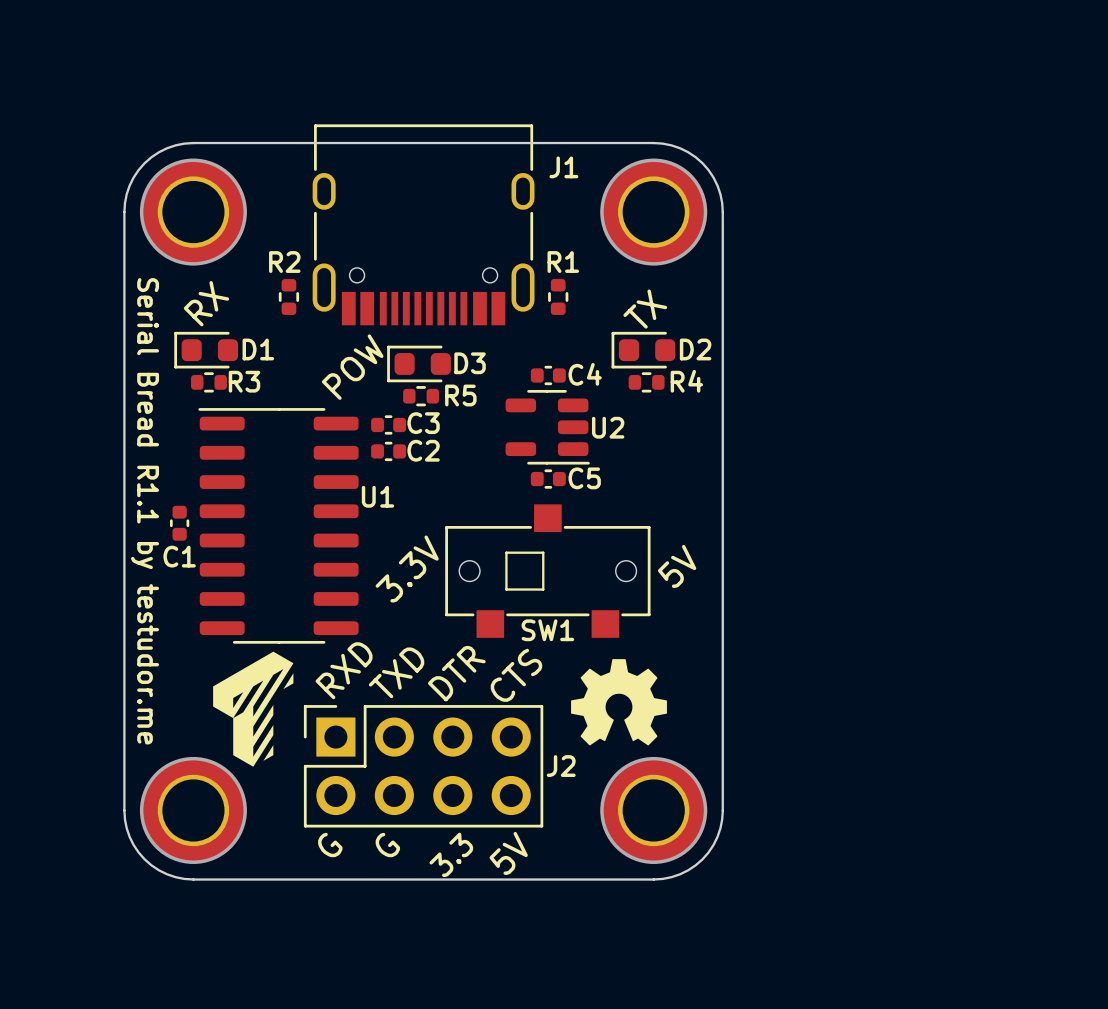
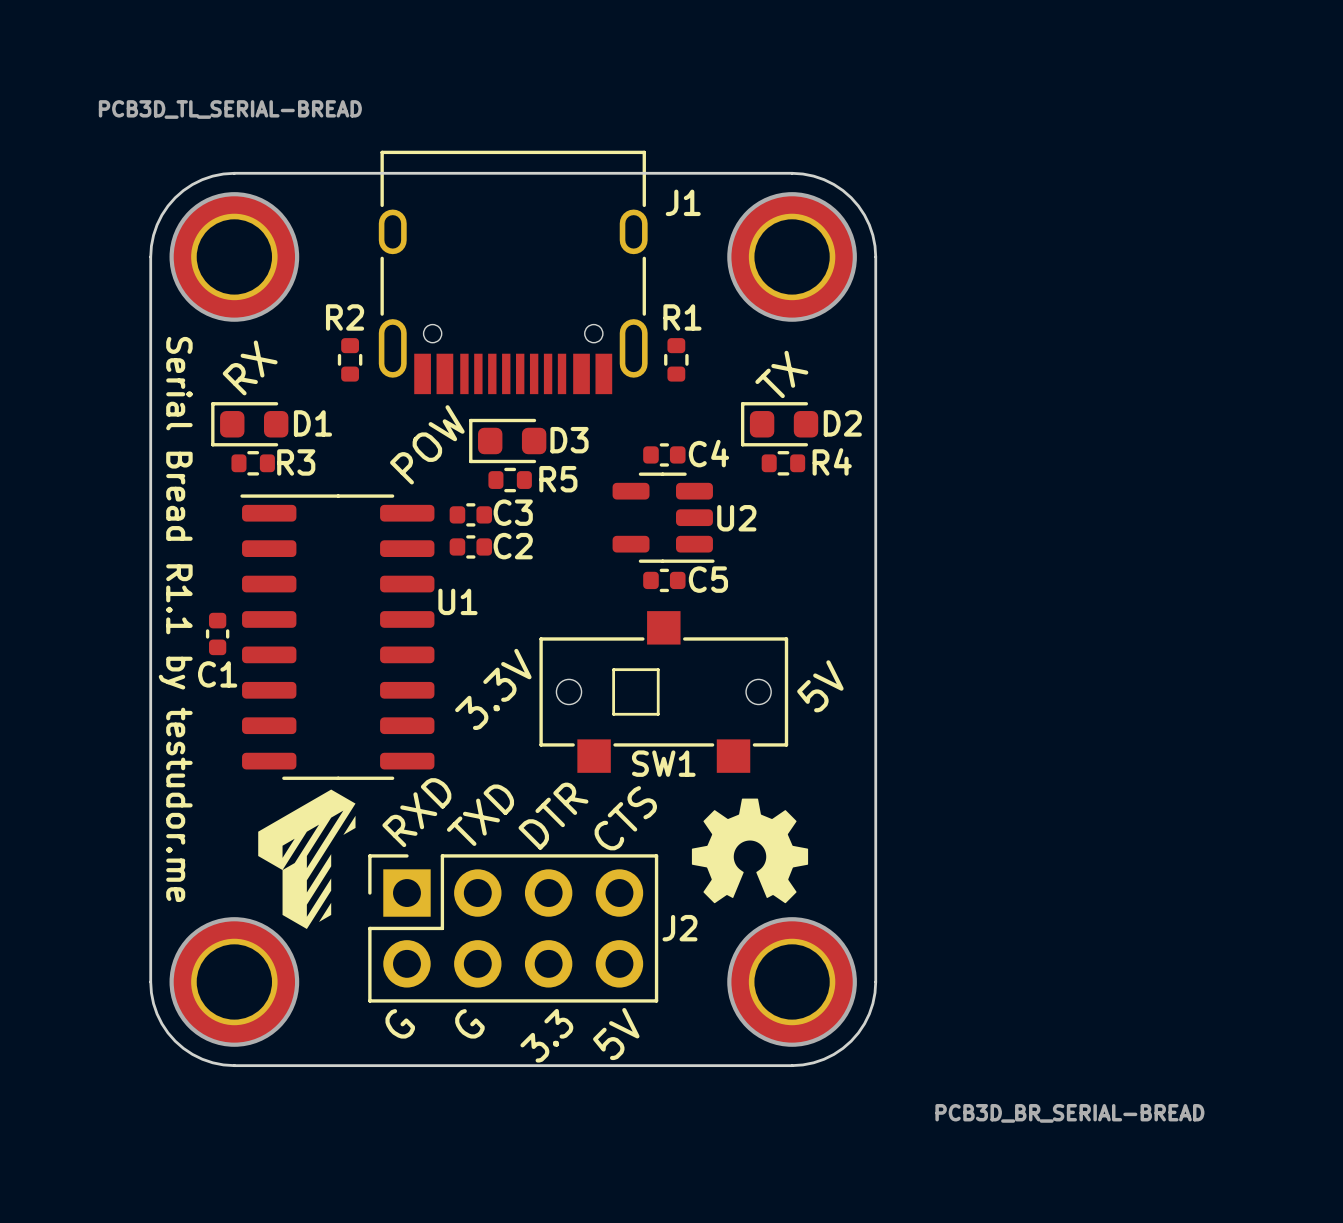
text: none -> PCB3D_TL_SERIAL-BREAD (230, 109)
text: none -> PCB3D_BR_SERIAL-BREAD (1069, 1113)

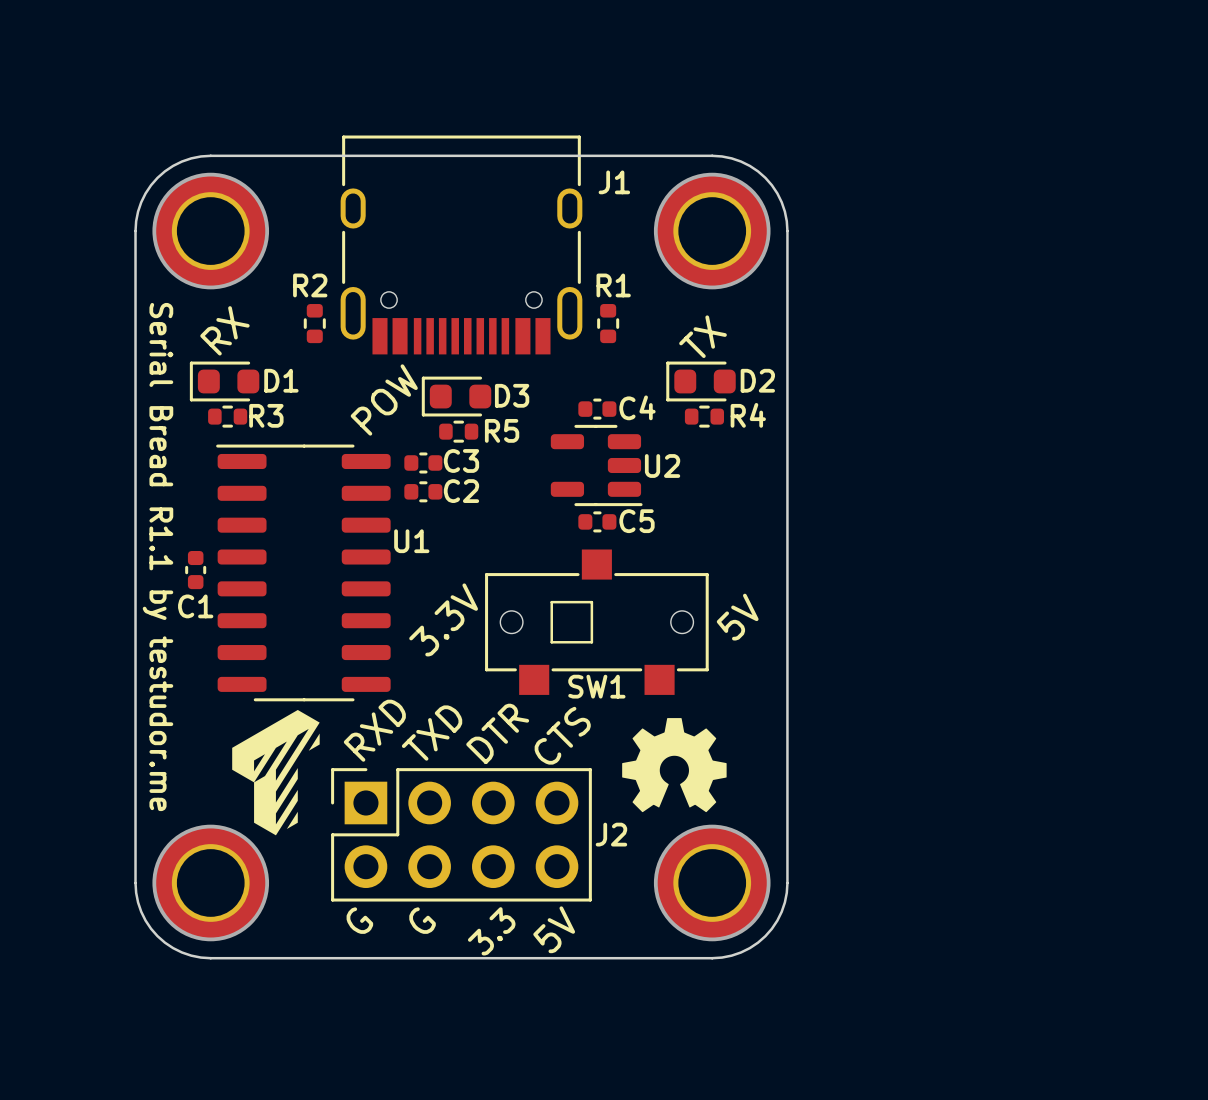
text: PCB3D_TL_SERIAL-BREAD (230, 109) -> none
text: PCB3D_BR_SERIAL-BREAD (1069, 1113) -> none

